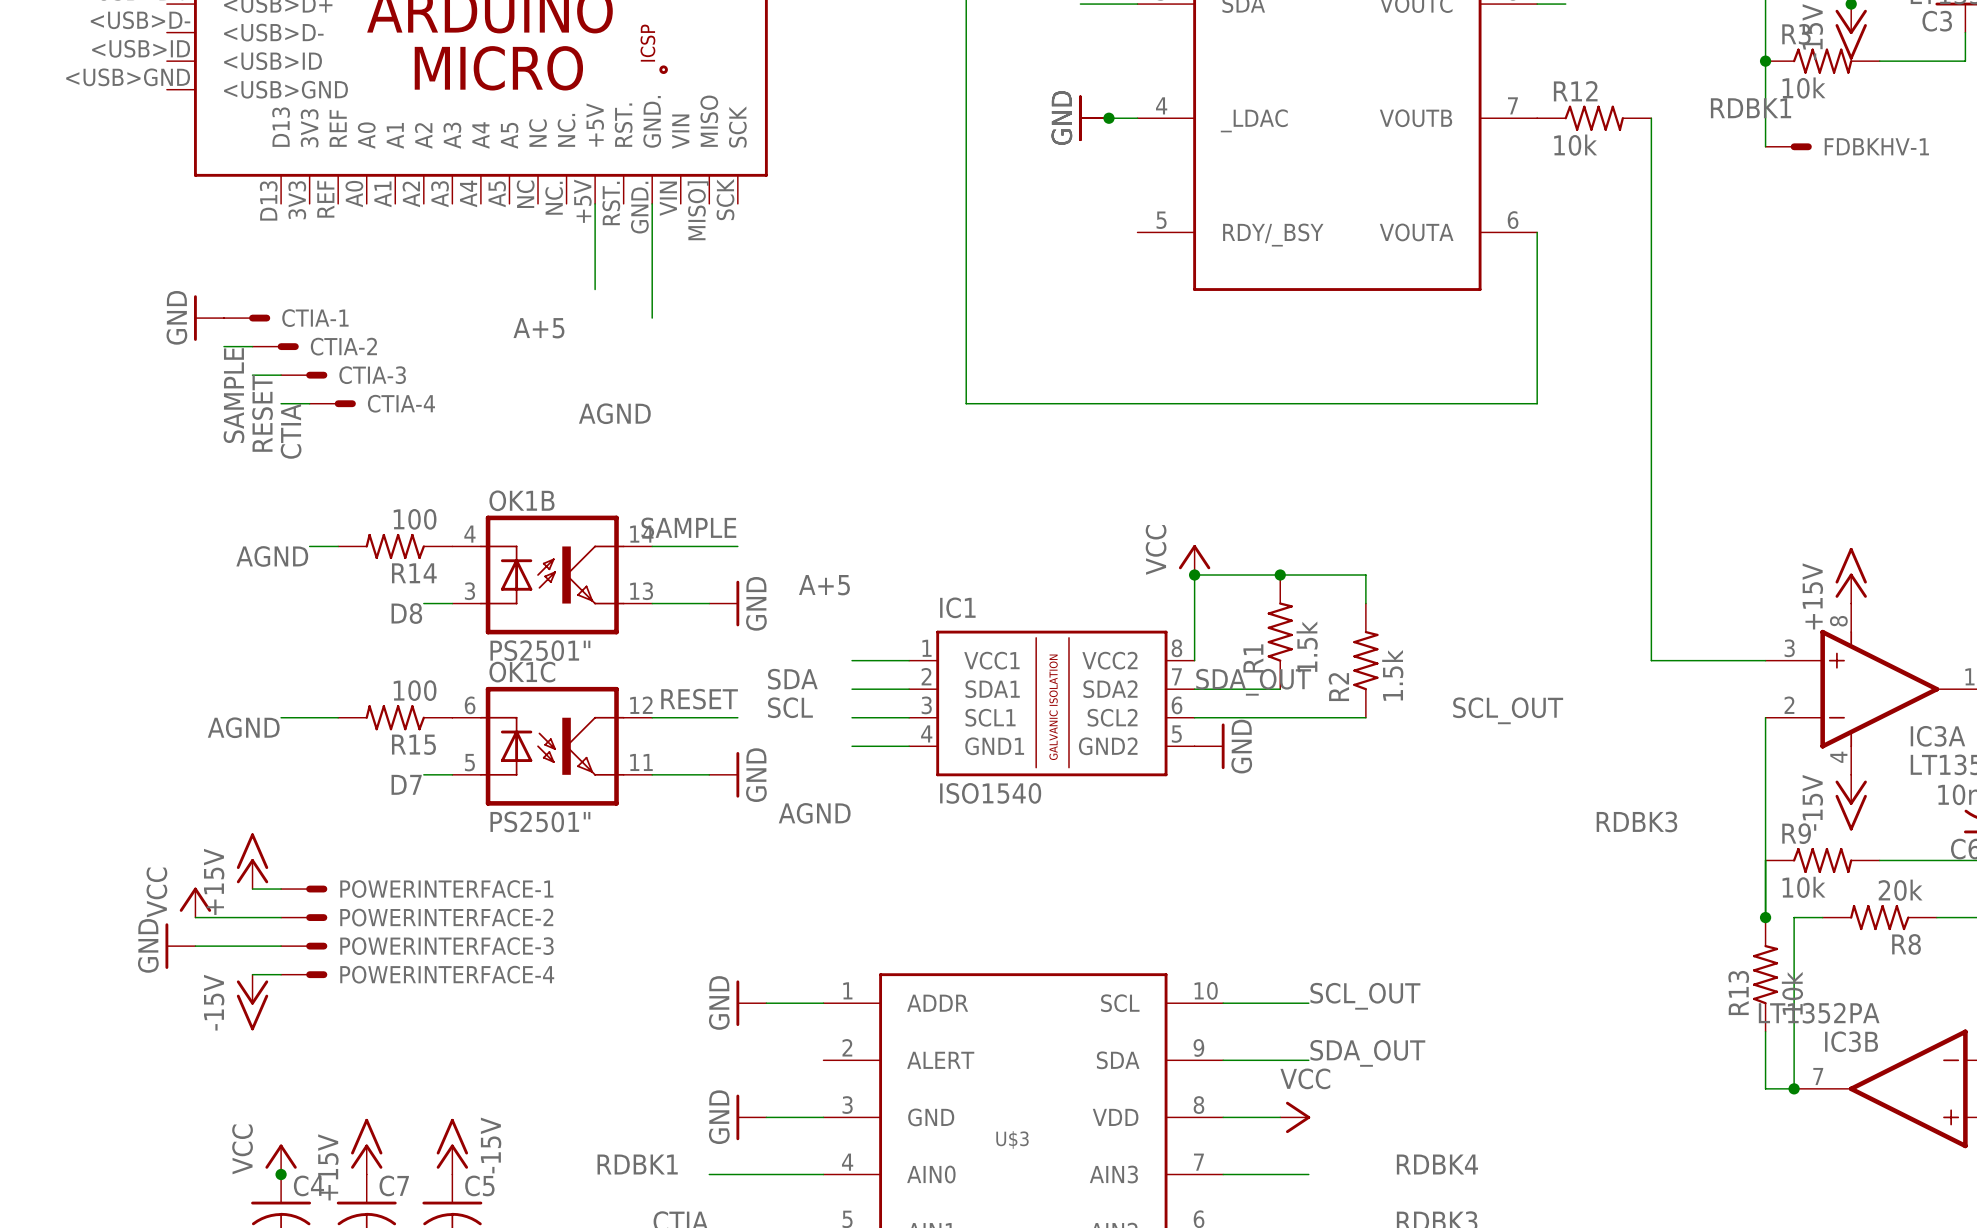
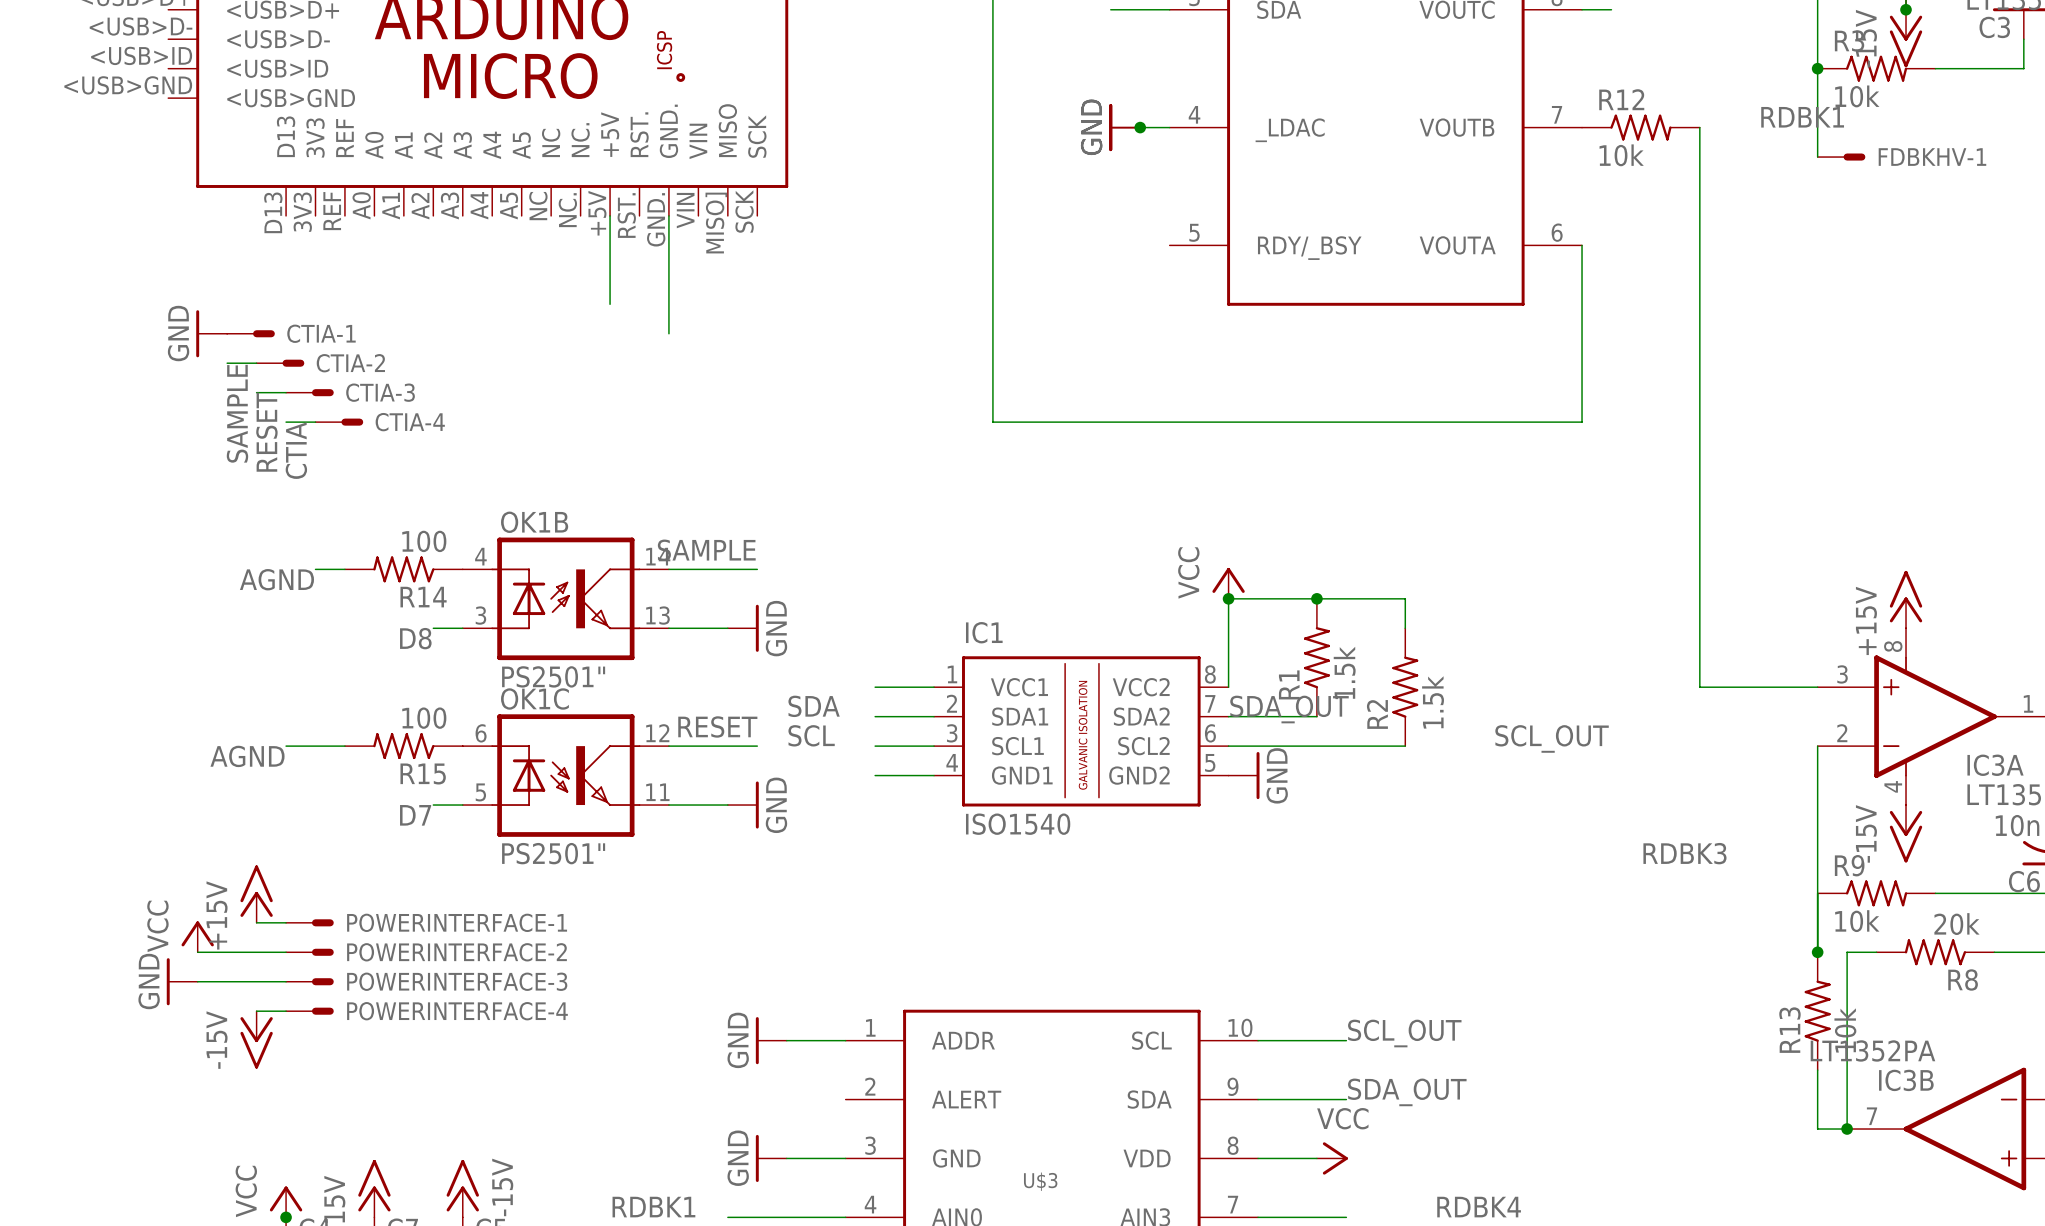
label: A+5 (538, 328) -> none
label: AGND (614, 413) -> none
label: A+5 (824, 585) -> none
label: AGND (814, 813) -> none

